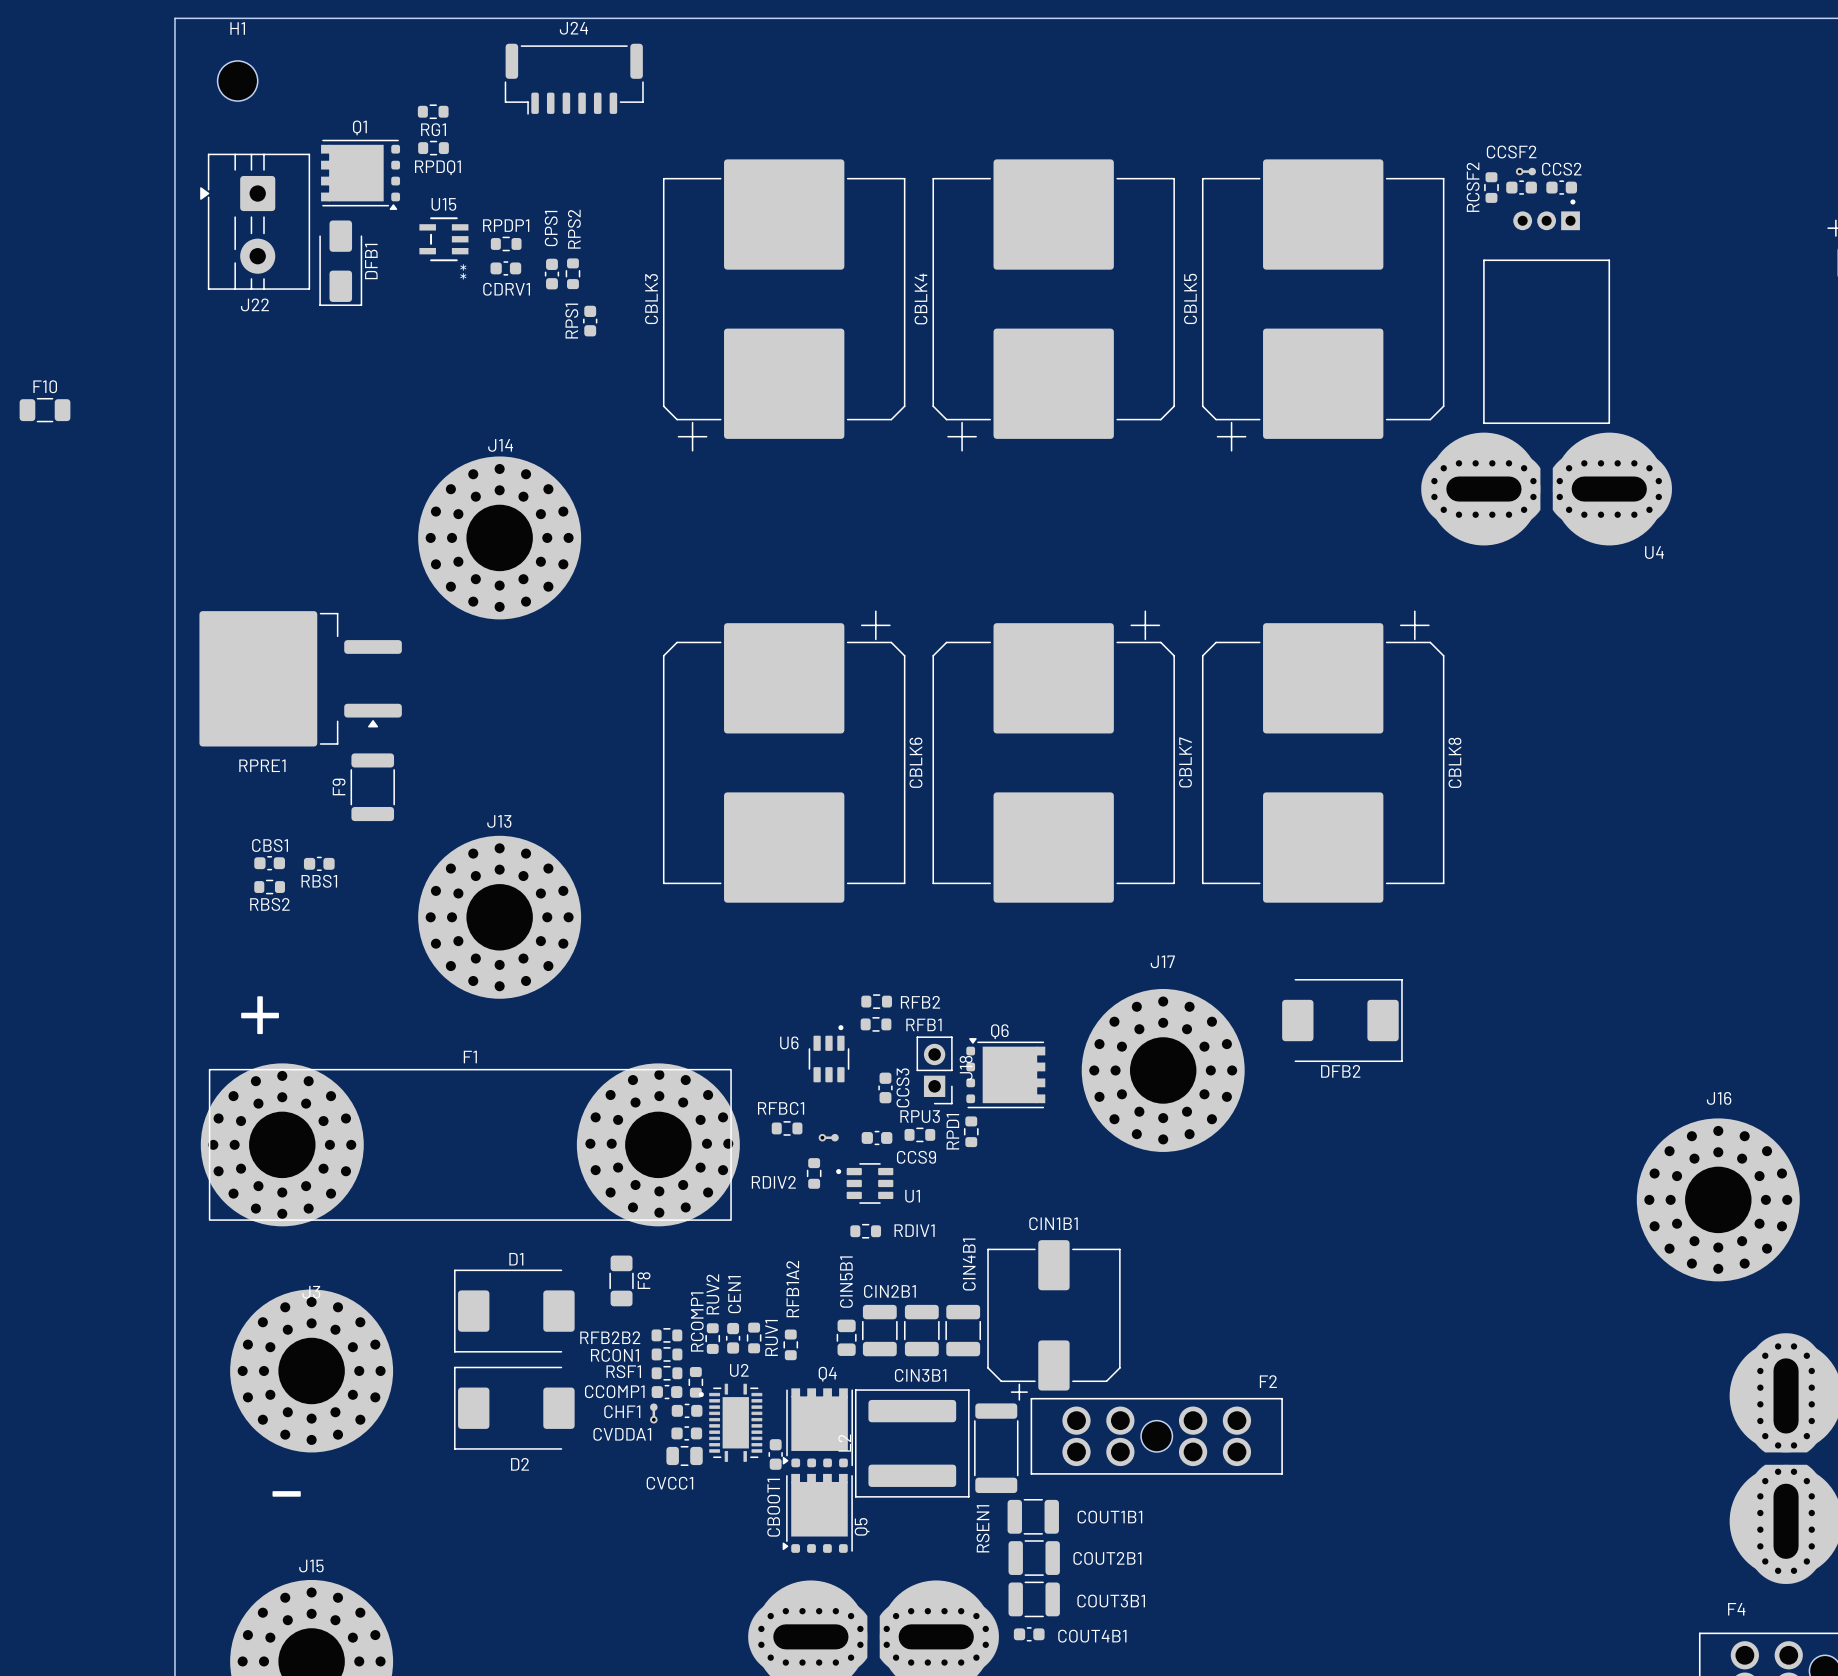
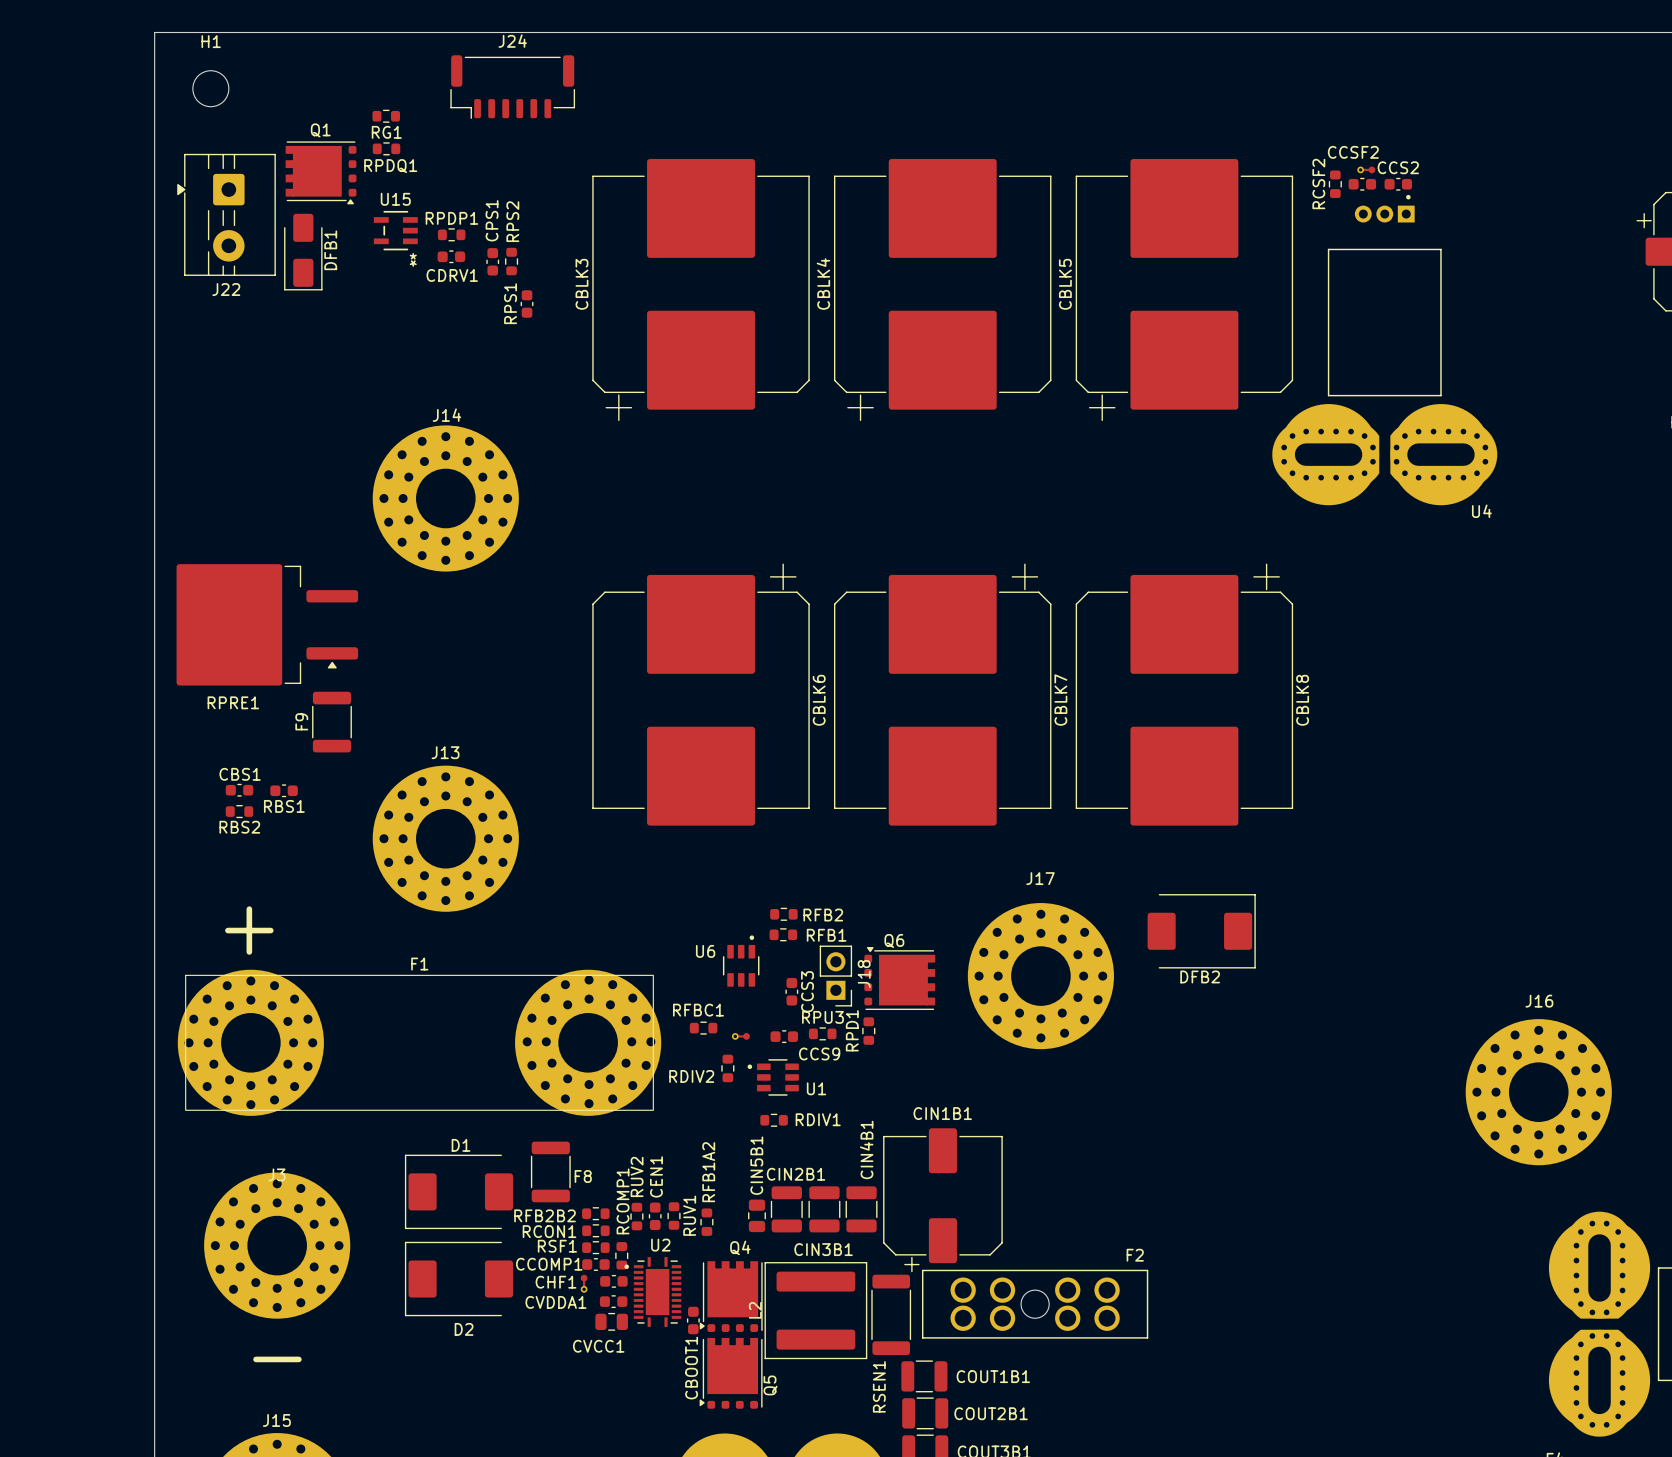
F10: (45, 410) -> none
F8 footprint: [609, 1255, 634, 1307] -> [530, 1141, 571, 1203]

